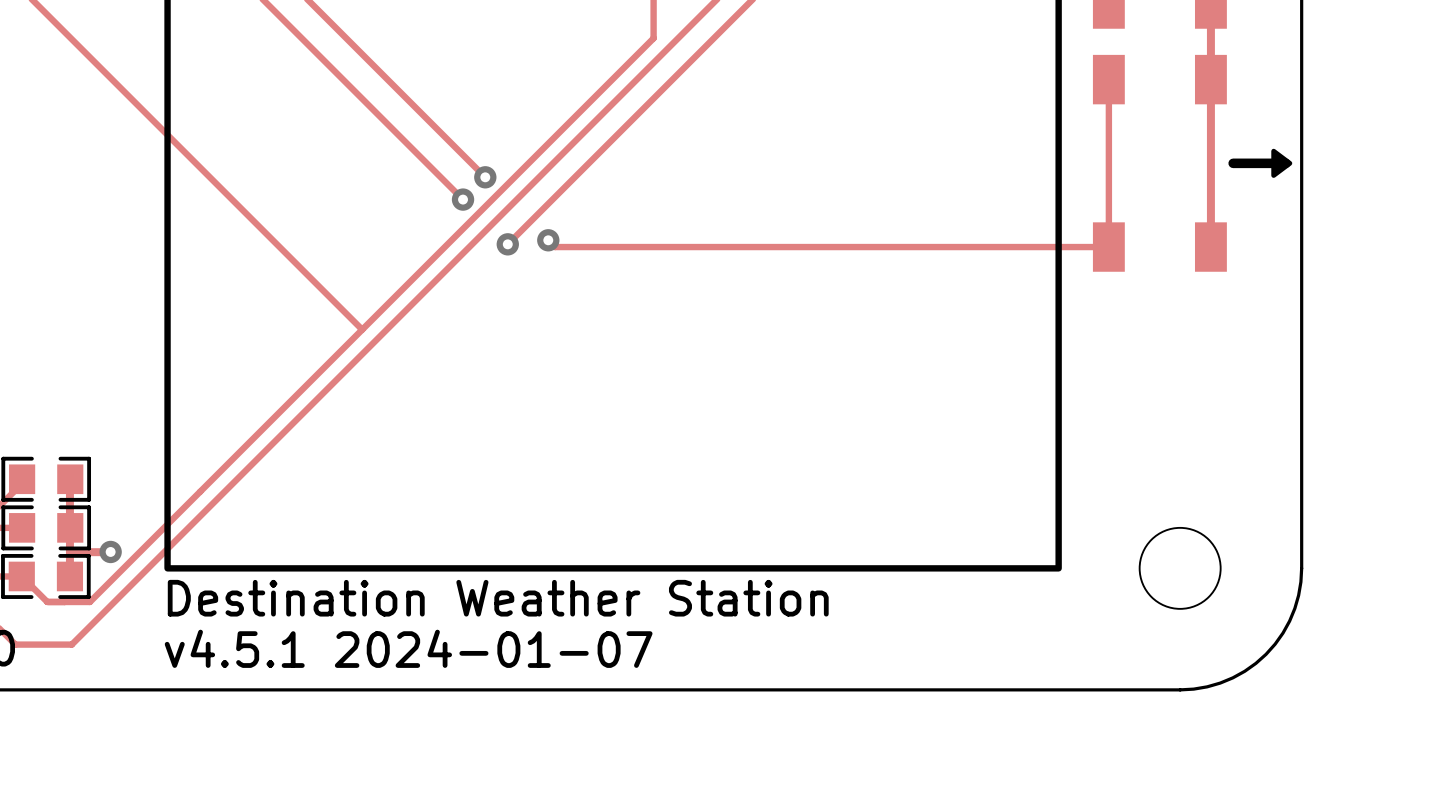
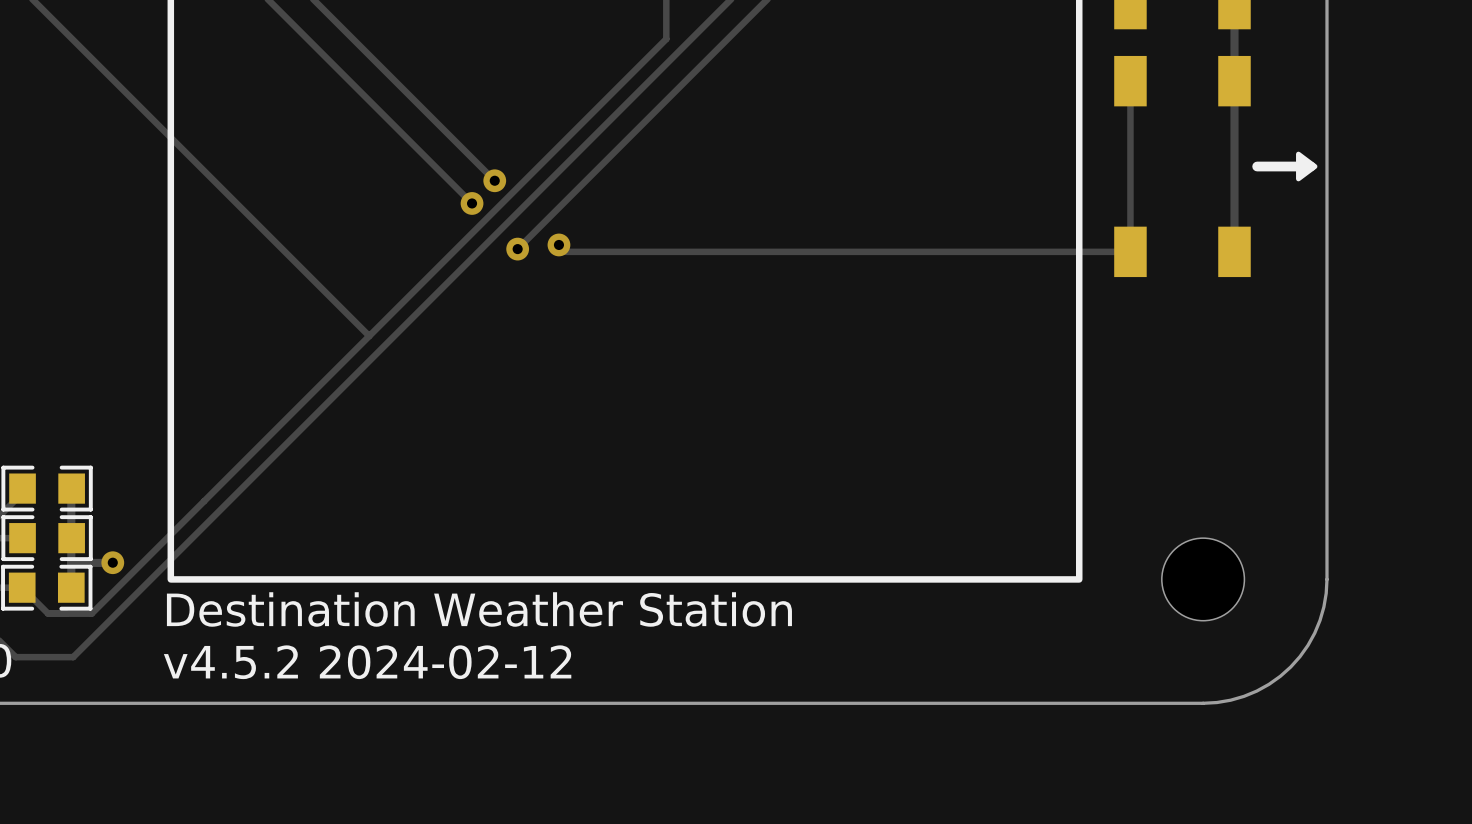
text: v4.5.1 2024-01-07 (408, 648) -> v4.5.2 2024-02-12 (367, 662)

